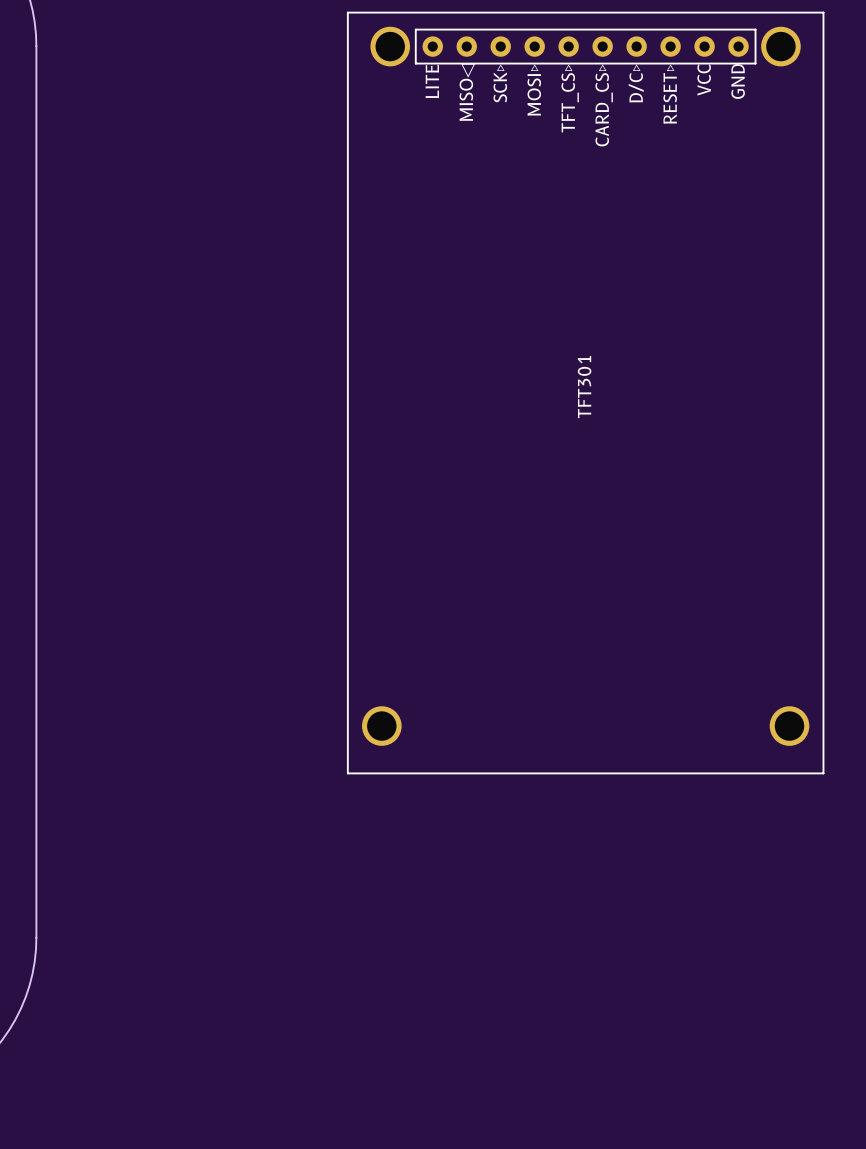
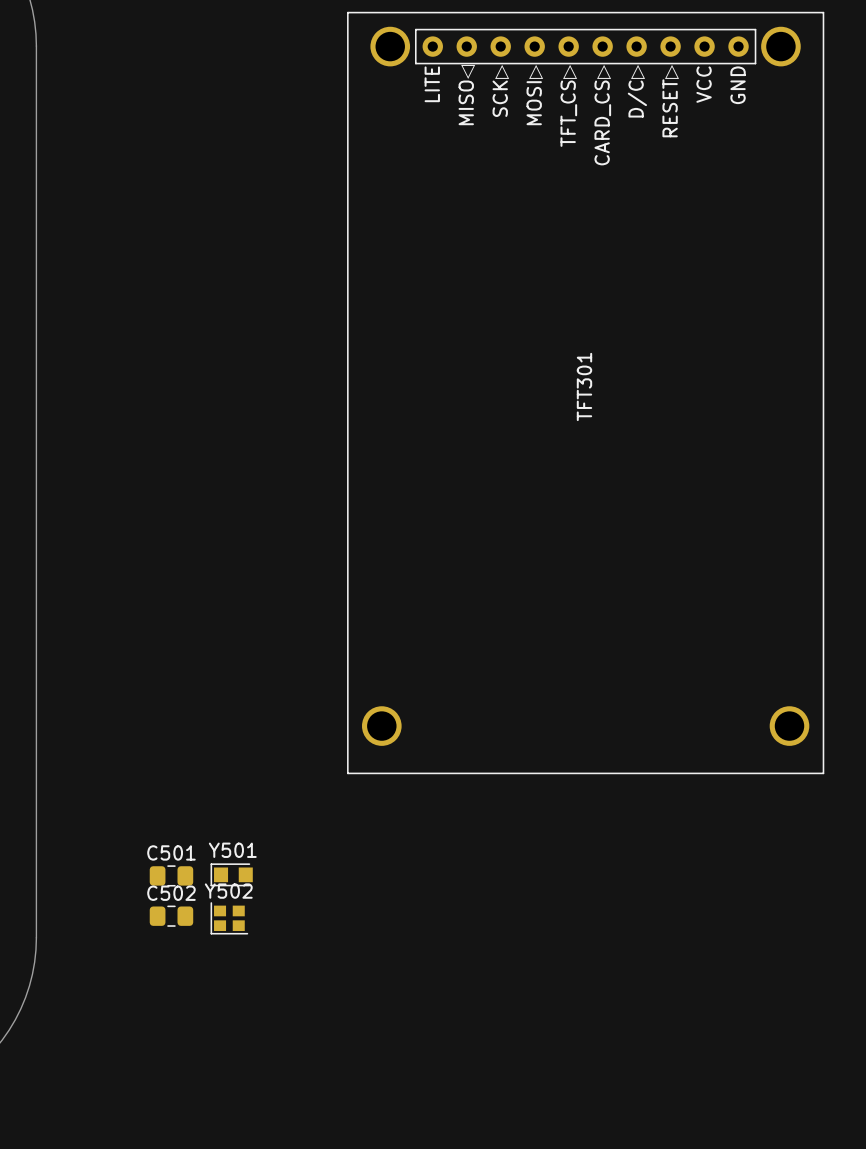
Y501: none -> (231, 874)
C501: none -> (171, 875)
C502: none -> (171, 916)
Y502: none -> (229, 918)

